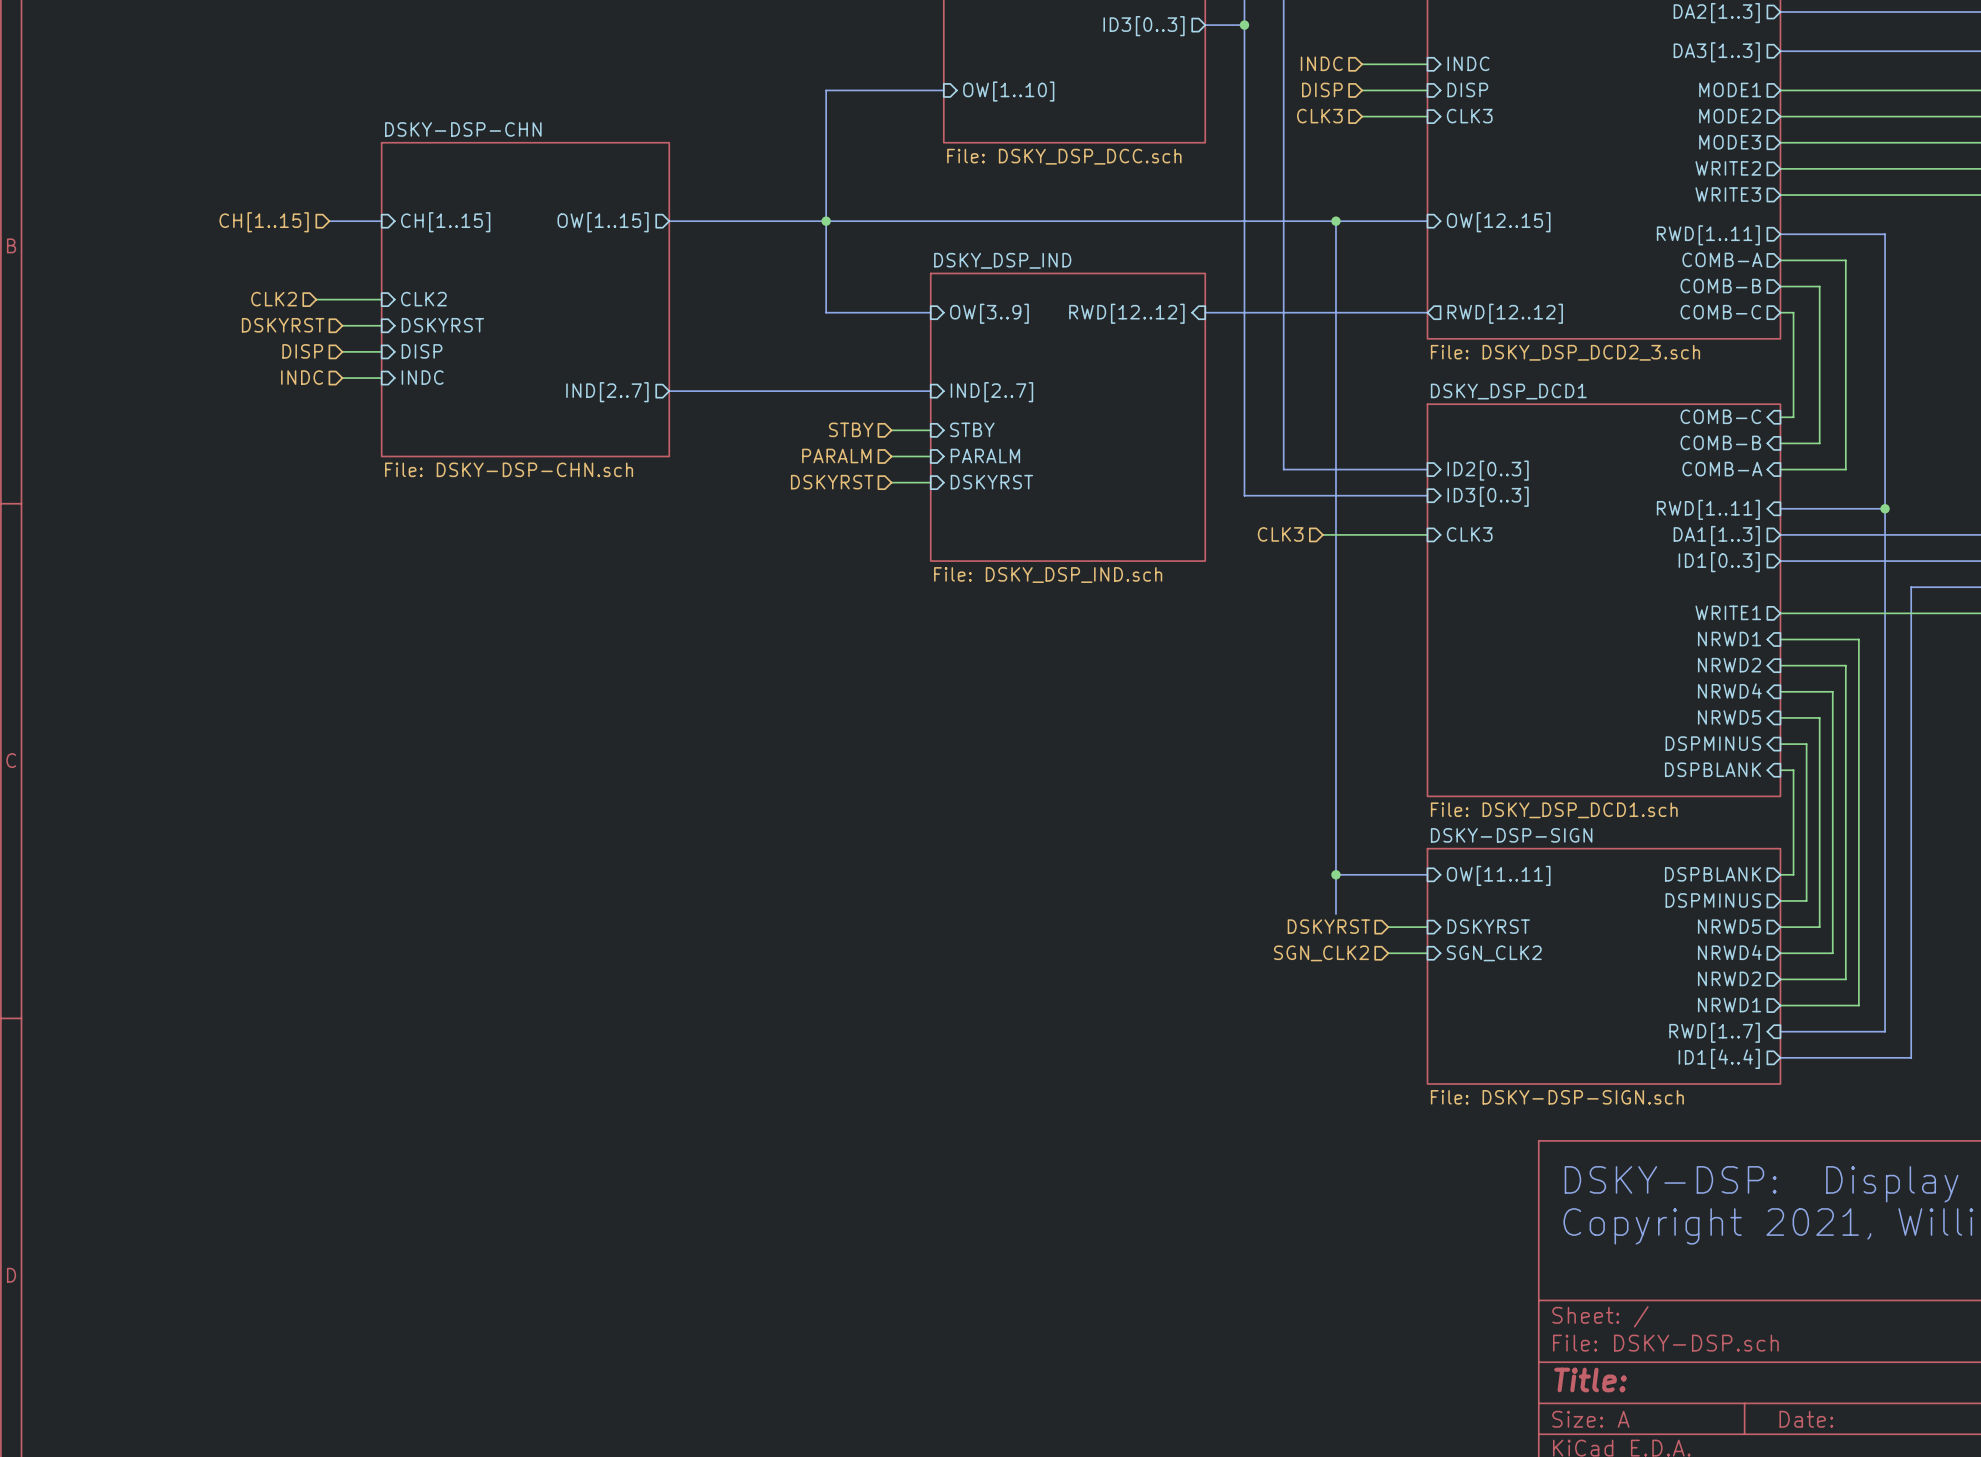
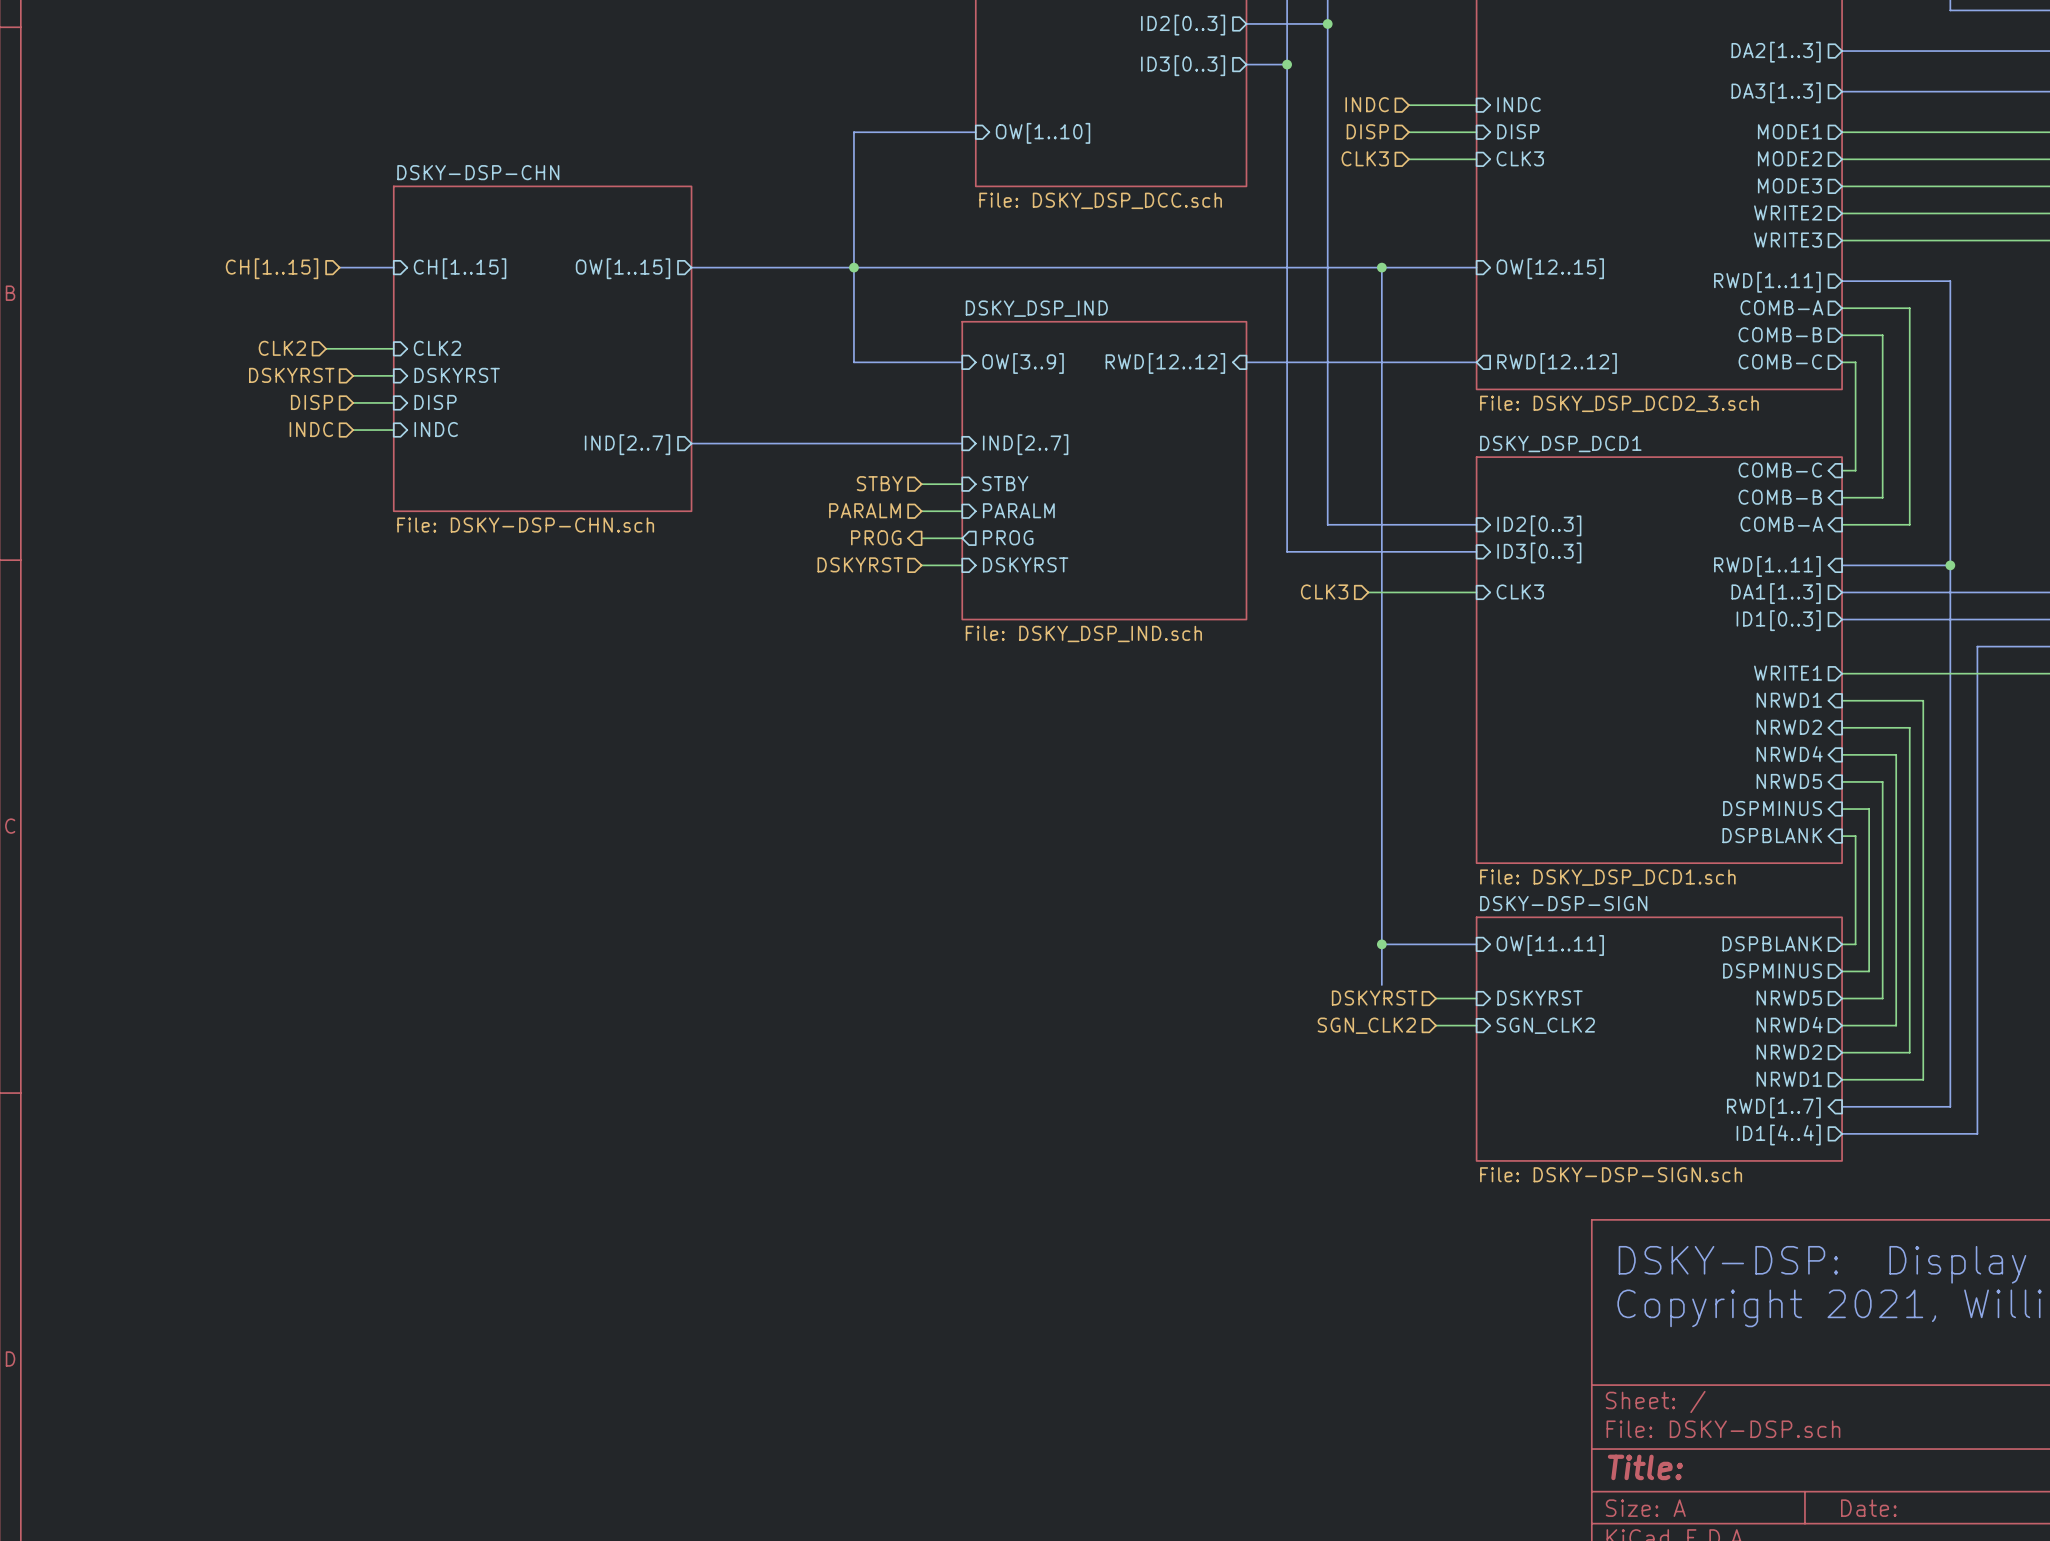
hierarchical label shape: input (832, 482) -> output (876, 537)
hierarchical label: DSKYRST (832, 482) -> PROG (876, 537)
sheet pin shape: input (991, 482) -> output (1008, 537)
sheet pin: DSKYRST (991, 482) -> PROG (1008, 537)
hierarchical label: none -> DSKYRST (860, 564)
wire: none -> (921, 565) (962, 565)
sheet pin: none -> DSKYRST (1025, 564)

